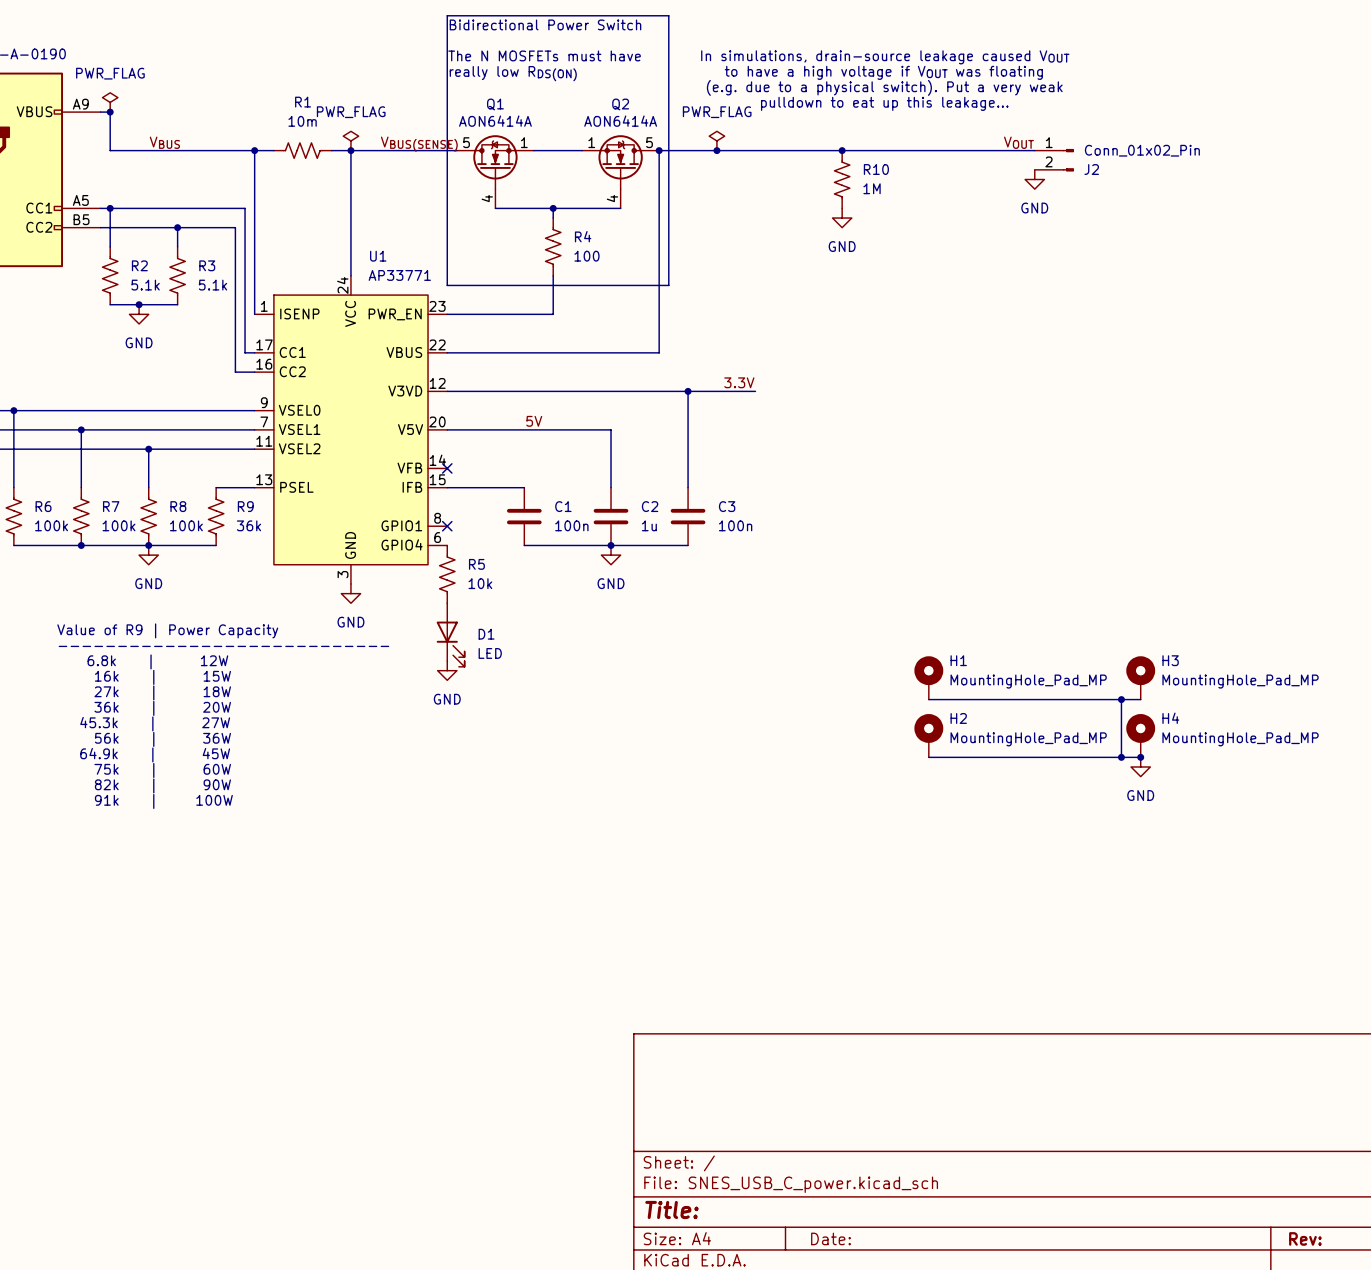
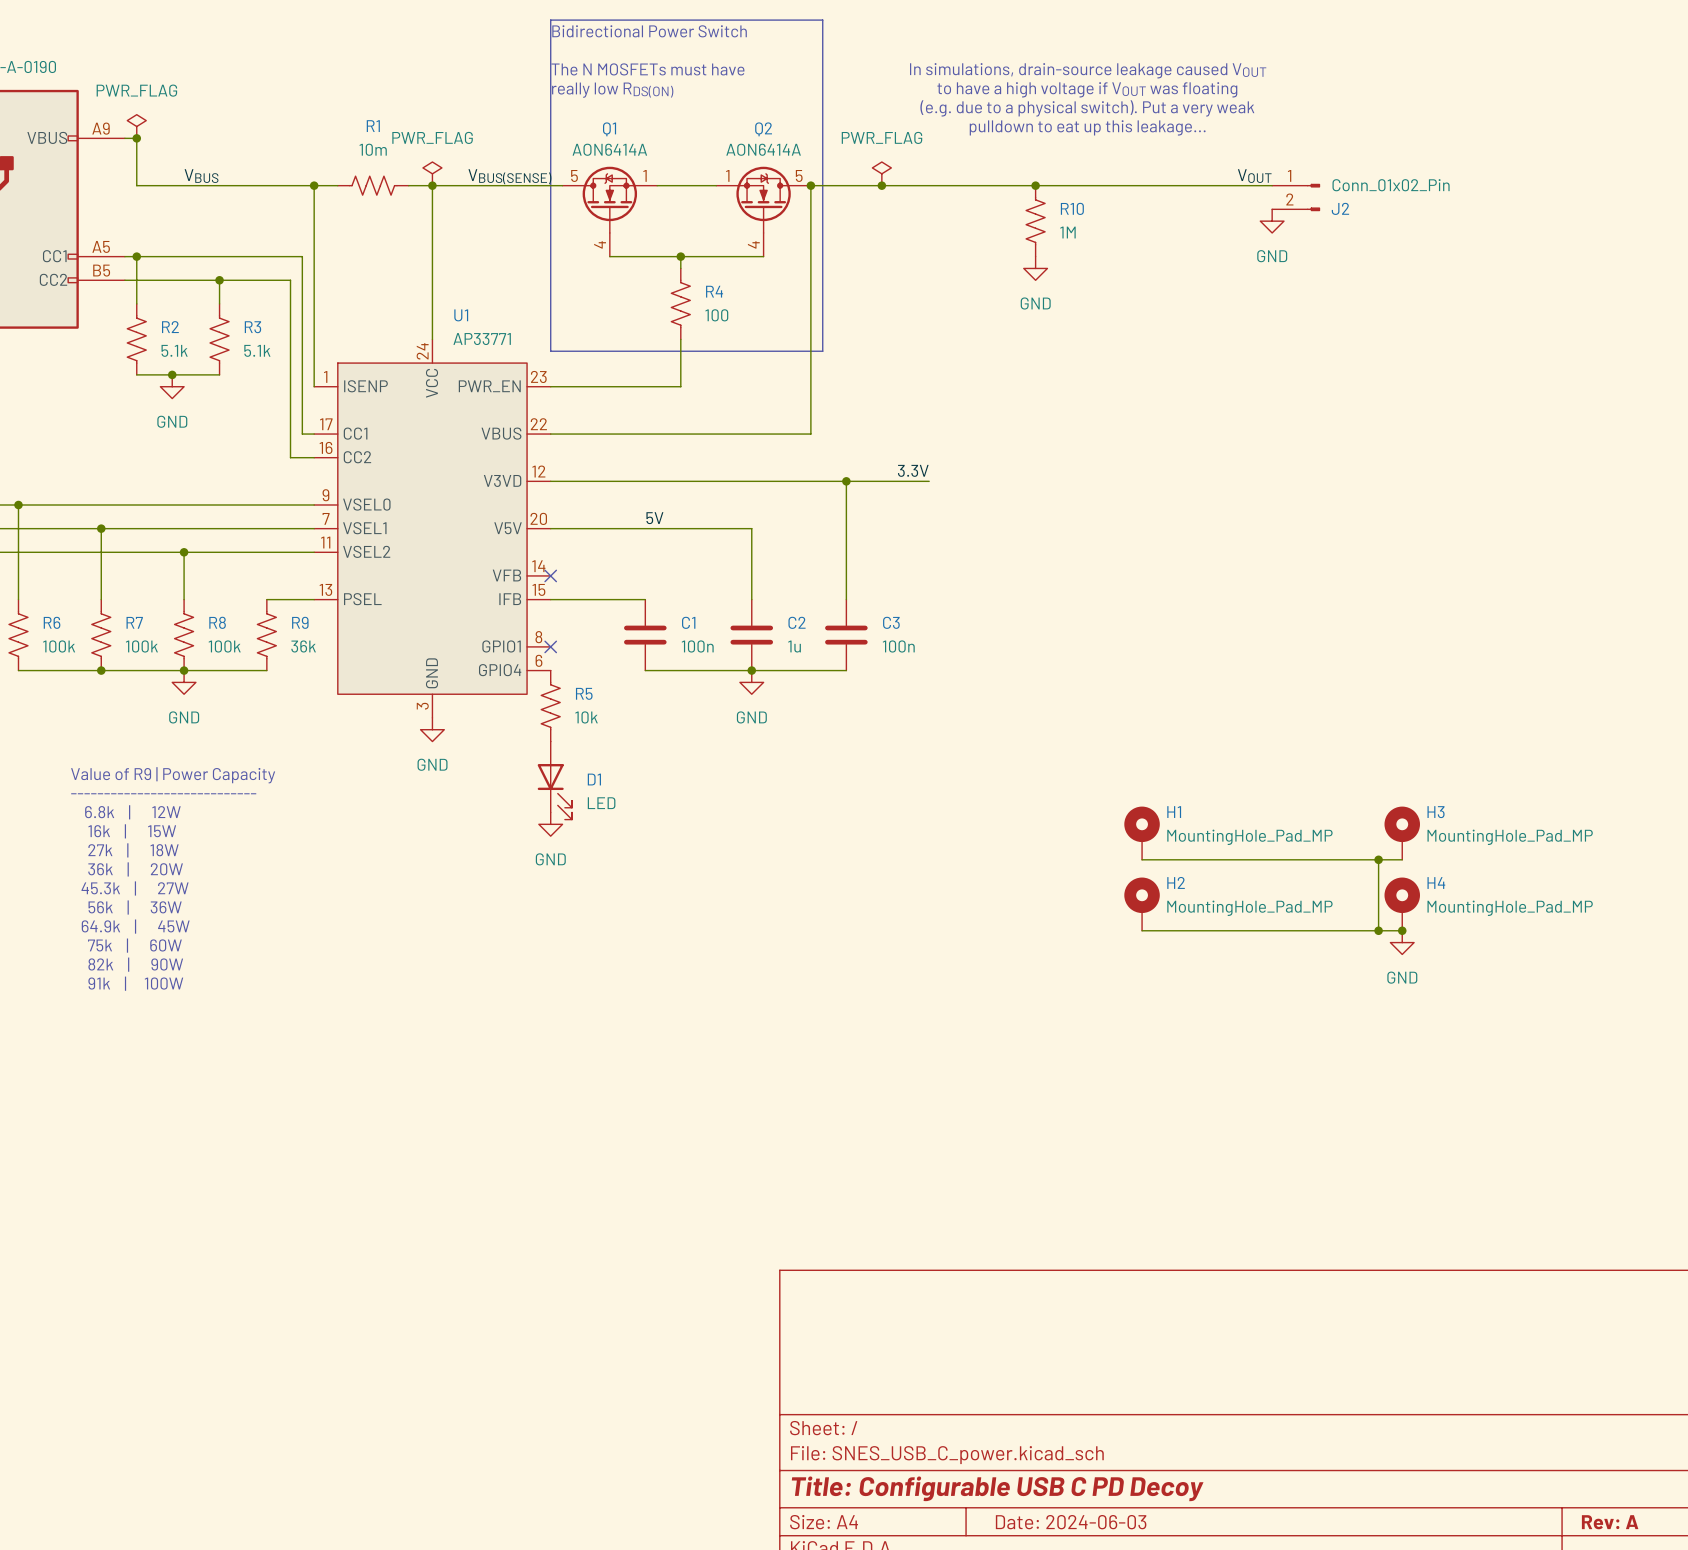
title block: Title: (671, 1209) -> Title: Configurable USB C PD Decoy (997, 1488)
title block: Date: (830, 1238) -> Date: 2024-06-03 (1071, 1522)
title block: Rev: (1305, 1238) -> Rev: A (1610, 1522)

